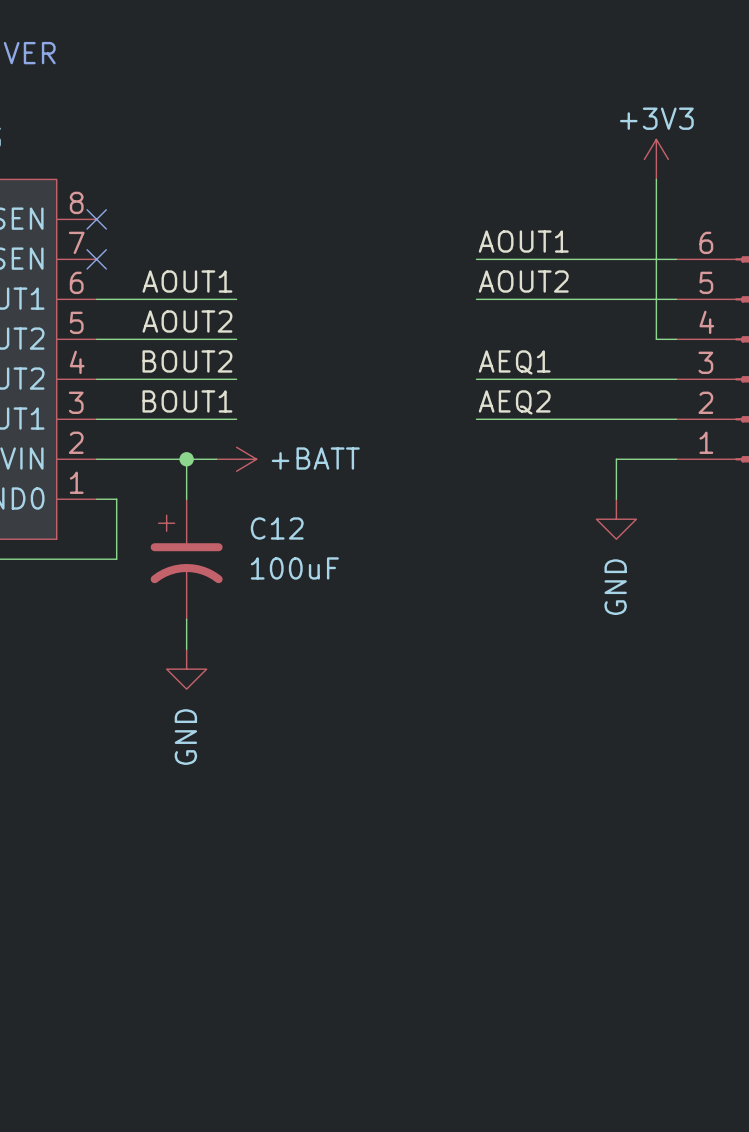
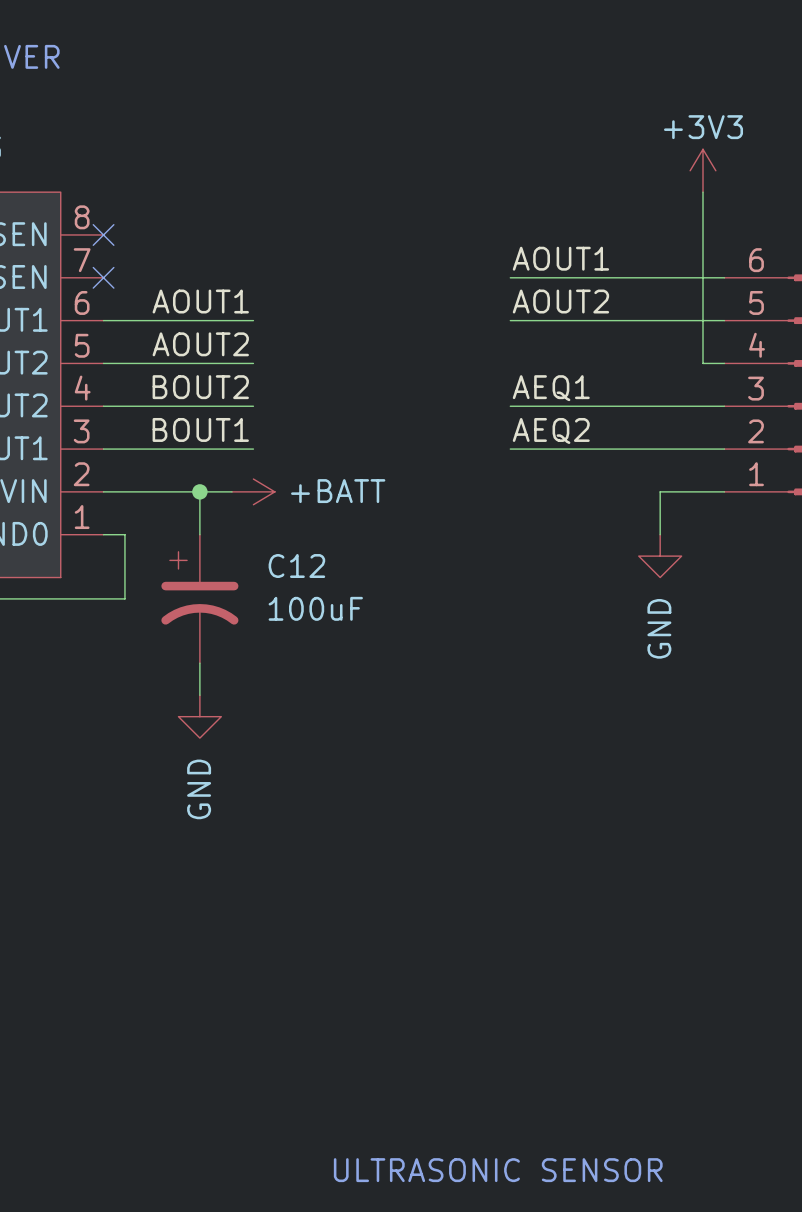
text: none -> ULTRASONIC SENSOR (498, 1170)

